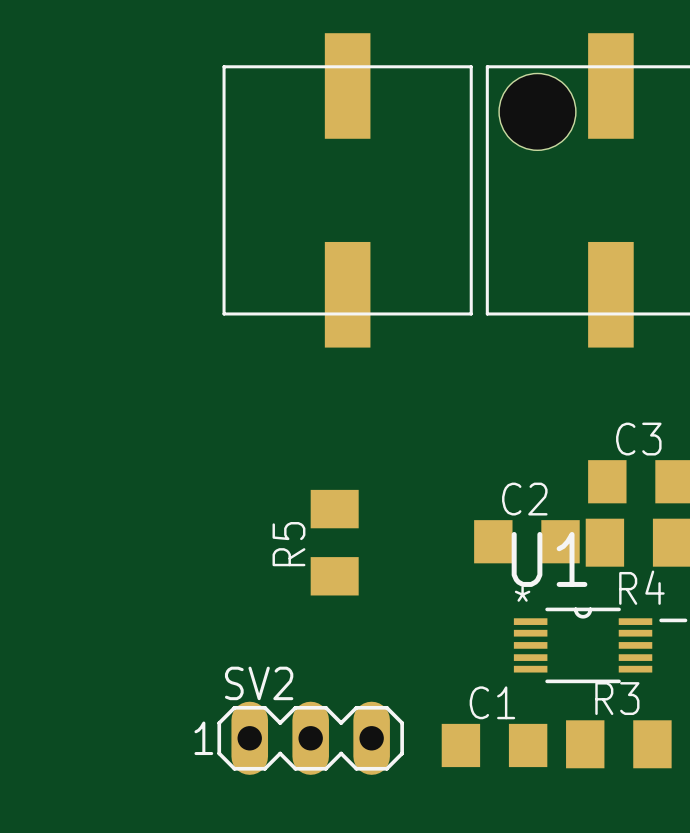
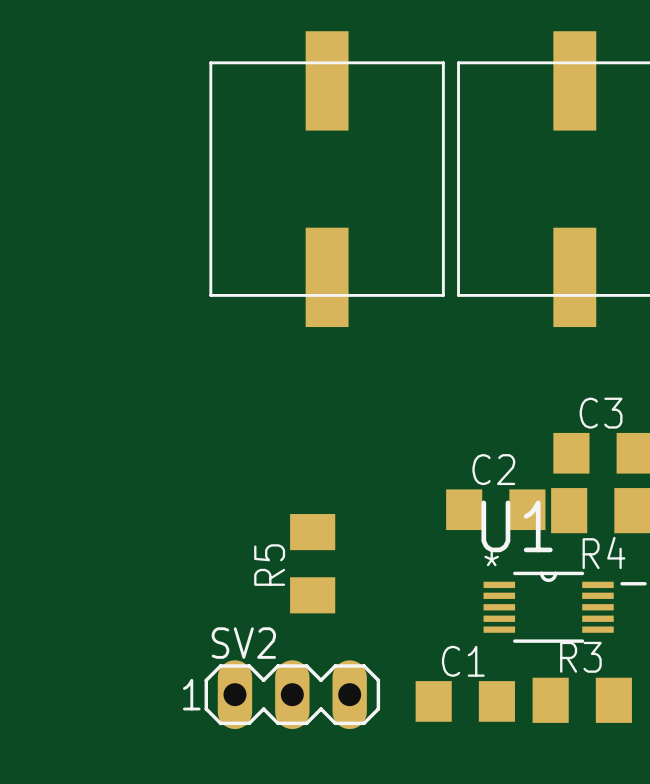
hole: (537, 111) -> none
R5 position: (334, 542) -> (312, 563)

